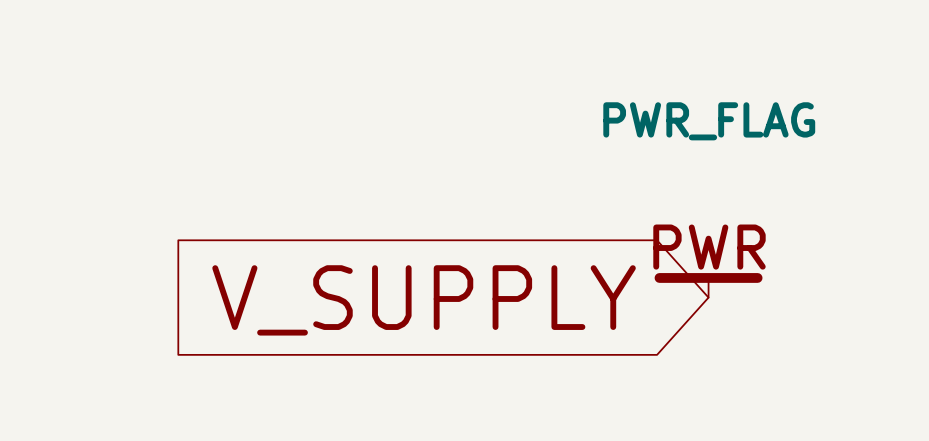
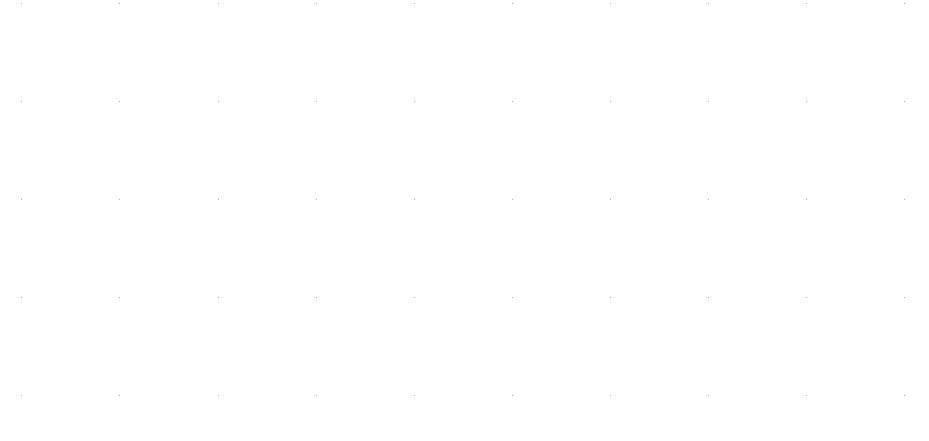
power symbol: PWR_FLAG (708, 285) -> none
global label: V_SUPPLY (424, 300) -> none

